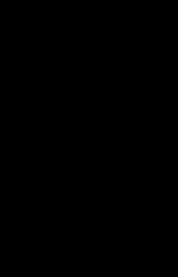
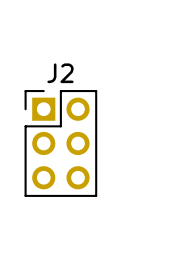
J2: none -> (60, 143)

